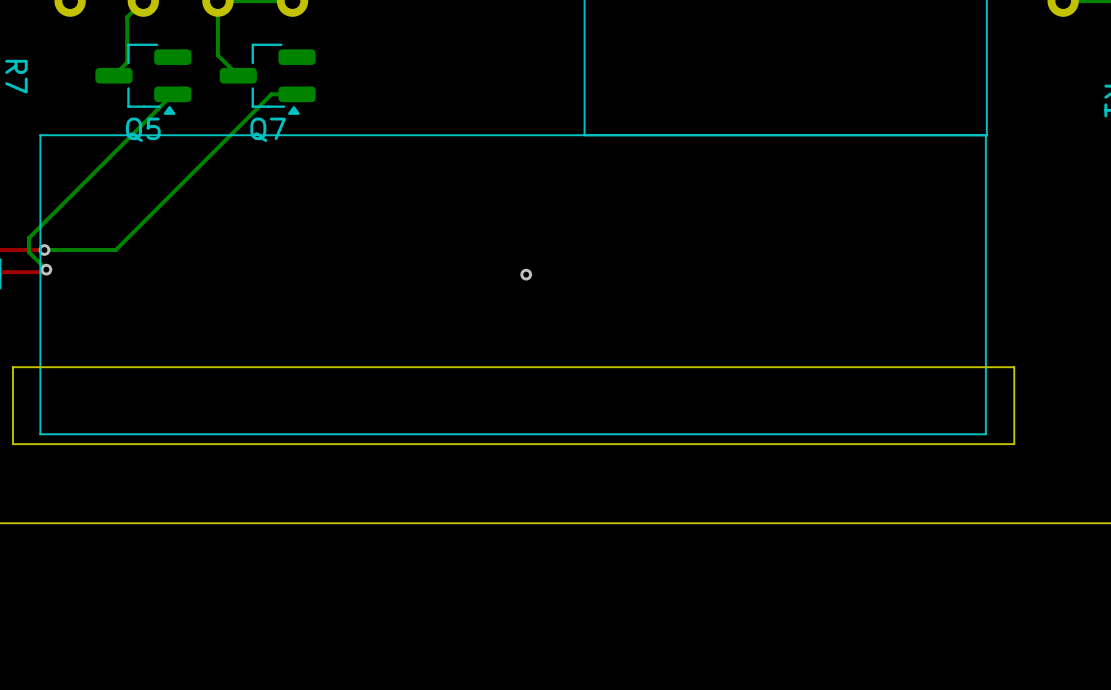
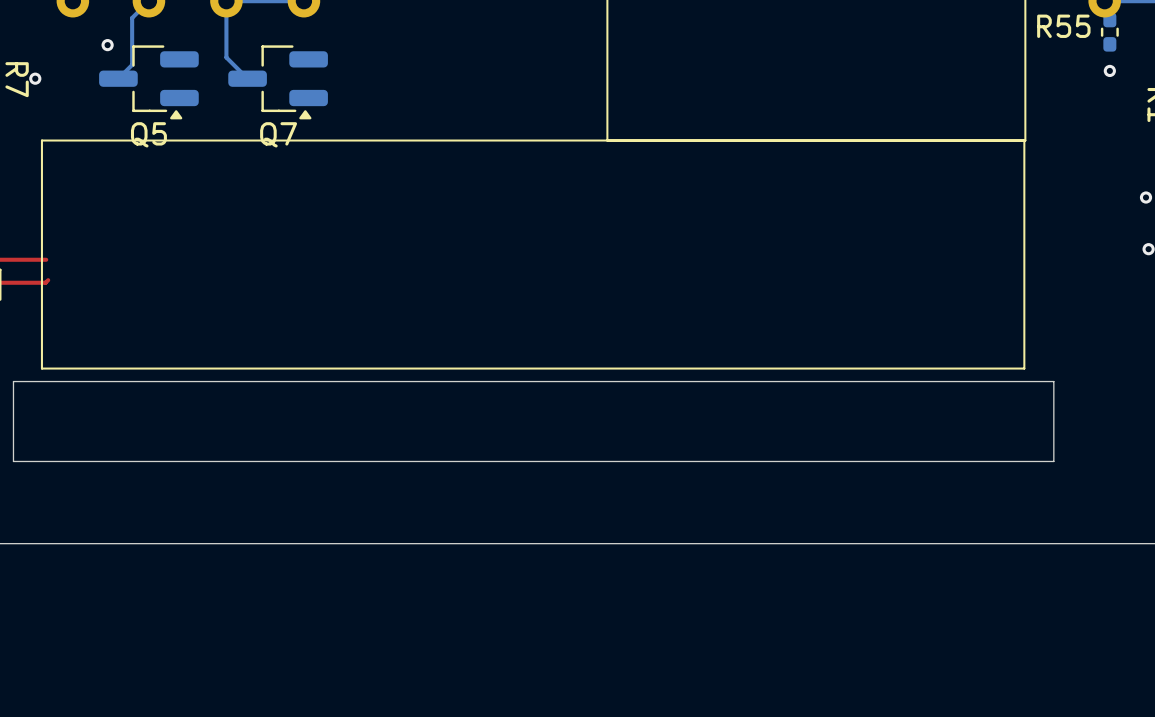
R55: none -> (1109, 32)
via: none -> (107, 45)
via: none -> (1109, 70)
via: none -> (35, 78)
bottom track: (172, 94) (28, 238) (28, 252) (46, 269) -> none
bottom track: (297, 94) (271, 94) (115, 250) (44, 250) -> none
via: none -> (1146, 197)
via: none -> (1148, 249)
via: (44, 250) -> none
via: (46, 269) -> none
via: (526, 274) -> none
line: (985, 354) (985, 434) (40, 434) (40, 354) -> (1024, 368) (41, 368)

